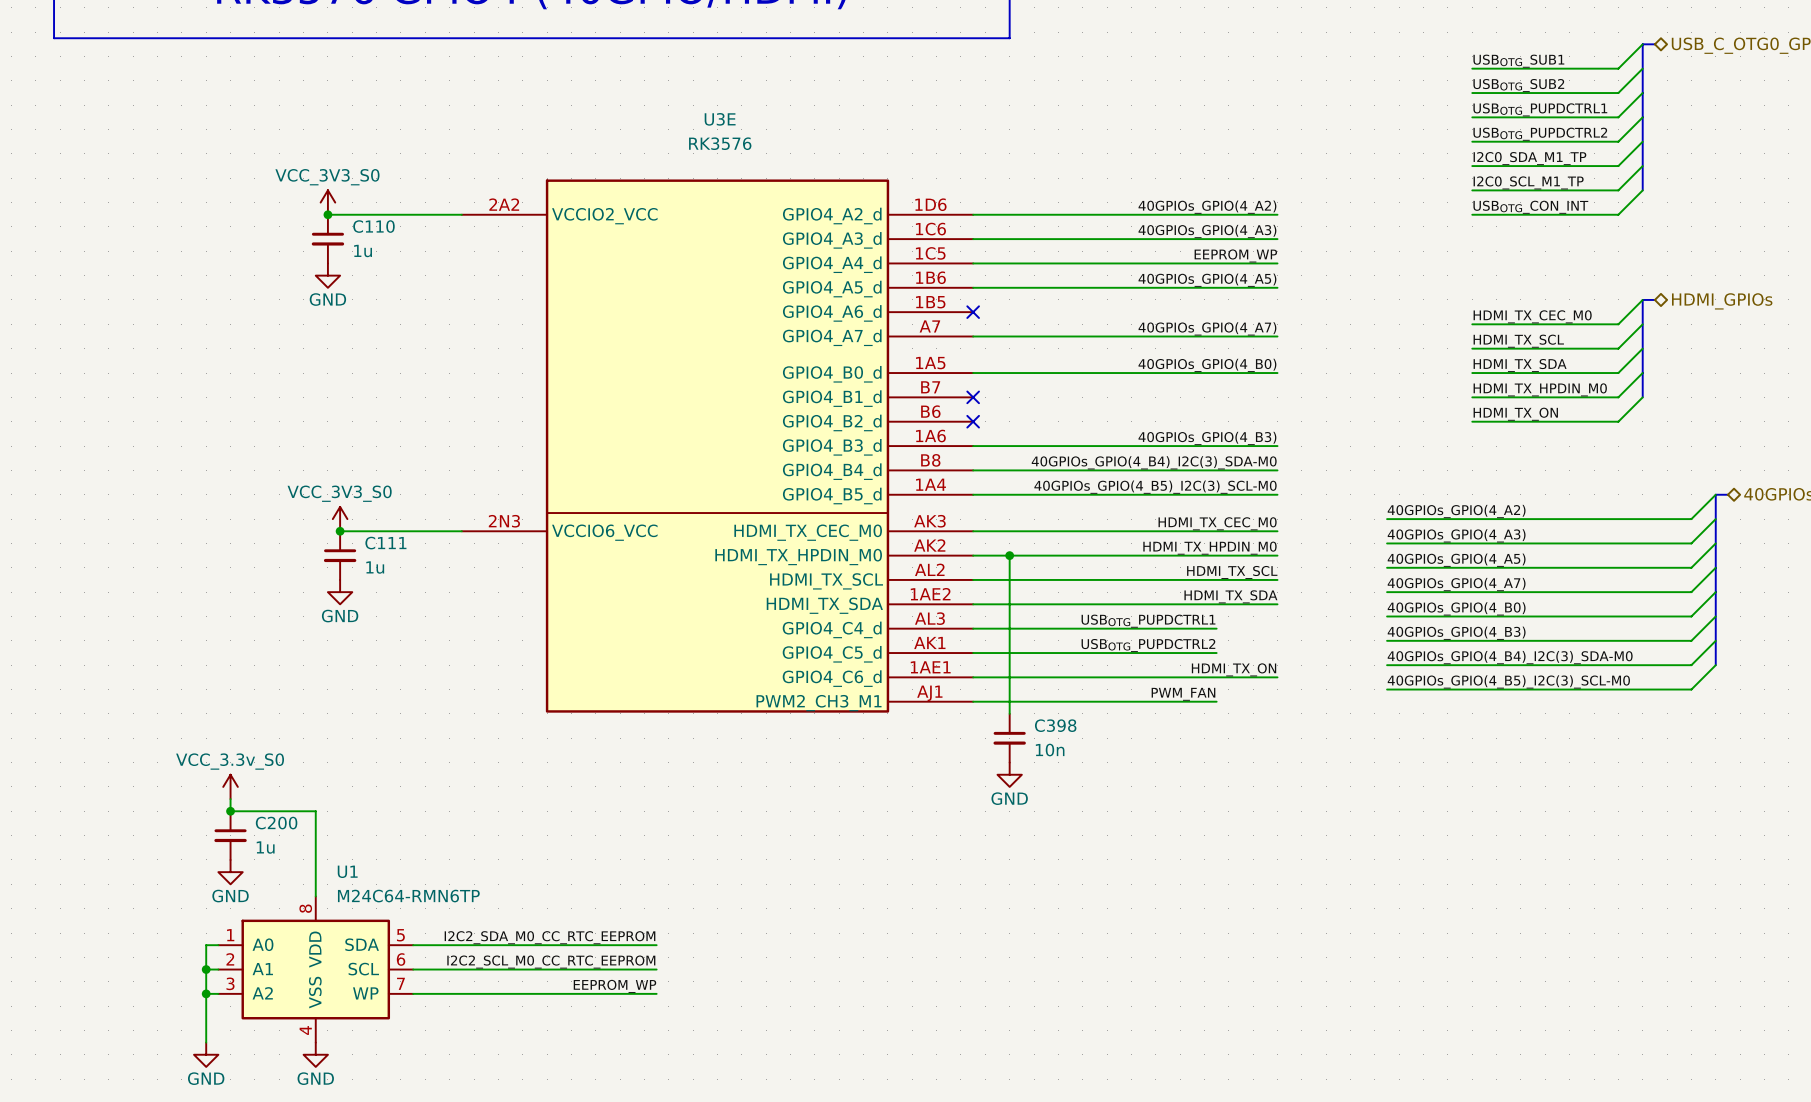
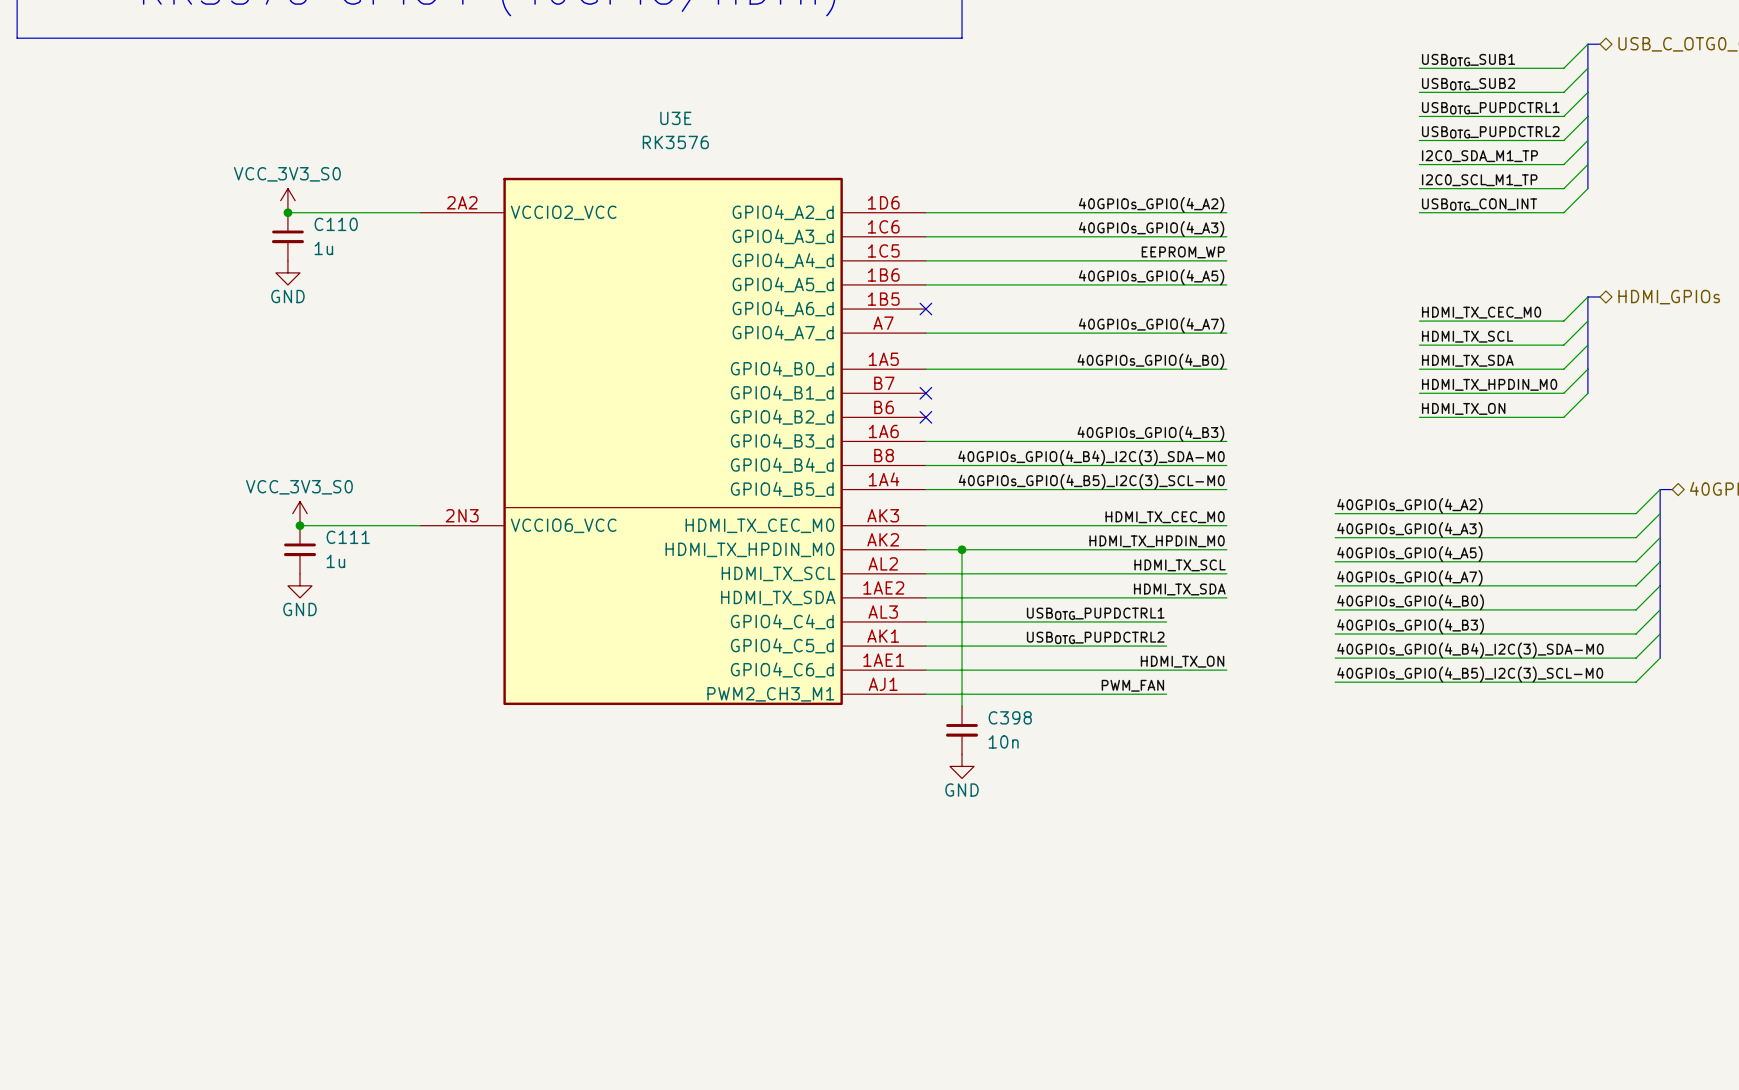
power symbol: VCC_3.3v_S0 (230, 786) -> none
wire: (230, 799) (230, 811) (315, 811) (315, 896) -> none
junction: (230, 811) -> none
C200: 1u (230, 835) -> none
power symbol: GND (230, 872) -> none
label: I2C2_SDA_M0_CC_RTC_EEPROM (550, 937) -> none
wire: (218, 945) (206, 945) (206, 1042) -> none
wire: (413, 945) (656, 945) -> none
label: I2C2_SCL_M0_CC_RTC_EEPROM (551, 962) -> none
wire: (206, 969) (218, 969) -> none
junction: (206, 969) -> none
U1: M24C64-RMN6TP (315, 969) -> none
wire: (413, 969) (656, 969) -> none
label: EEPROM_WP (614, 986) -> none
wire: (206, 993) (218, 993) -> none
junction: (206, 993) -> none
wire: (413, 993) (656, 993) -> none
power symbol: GND (206, 1054) -> none
power symbol: GND (315, 1054) -> none

